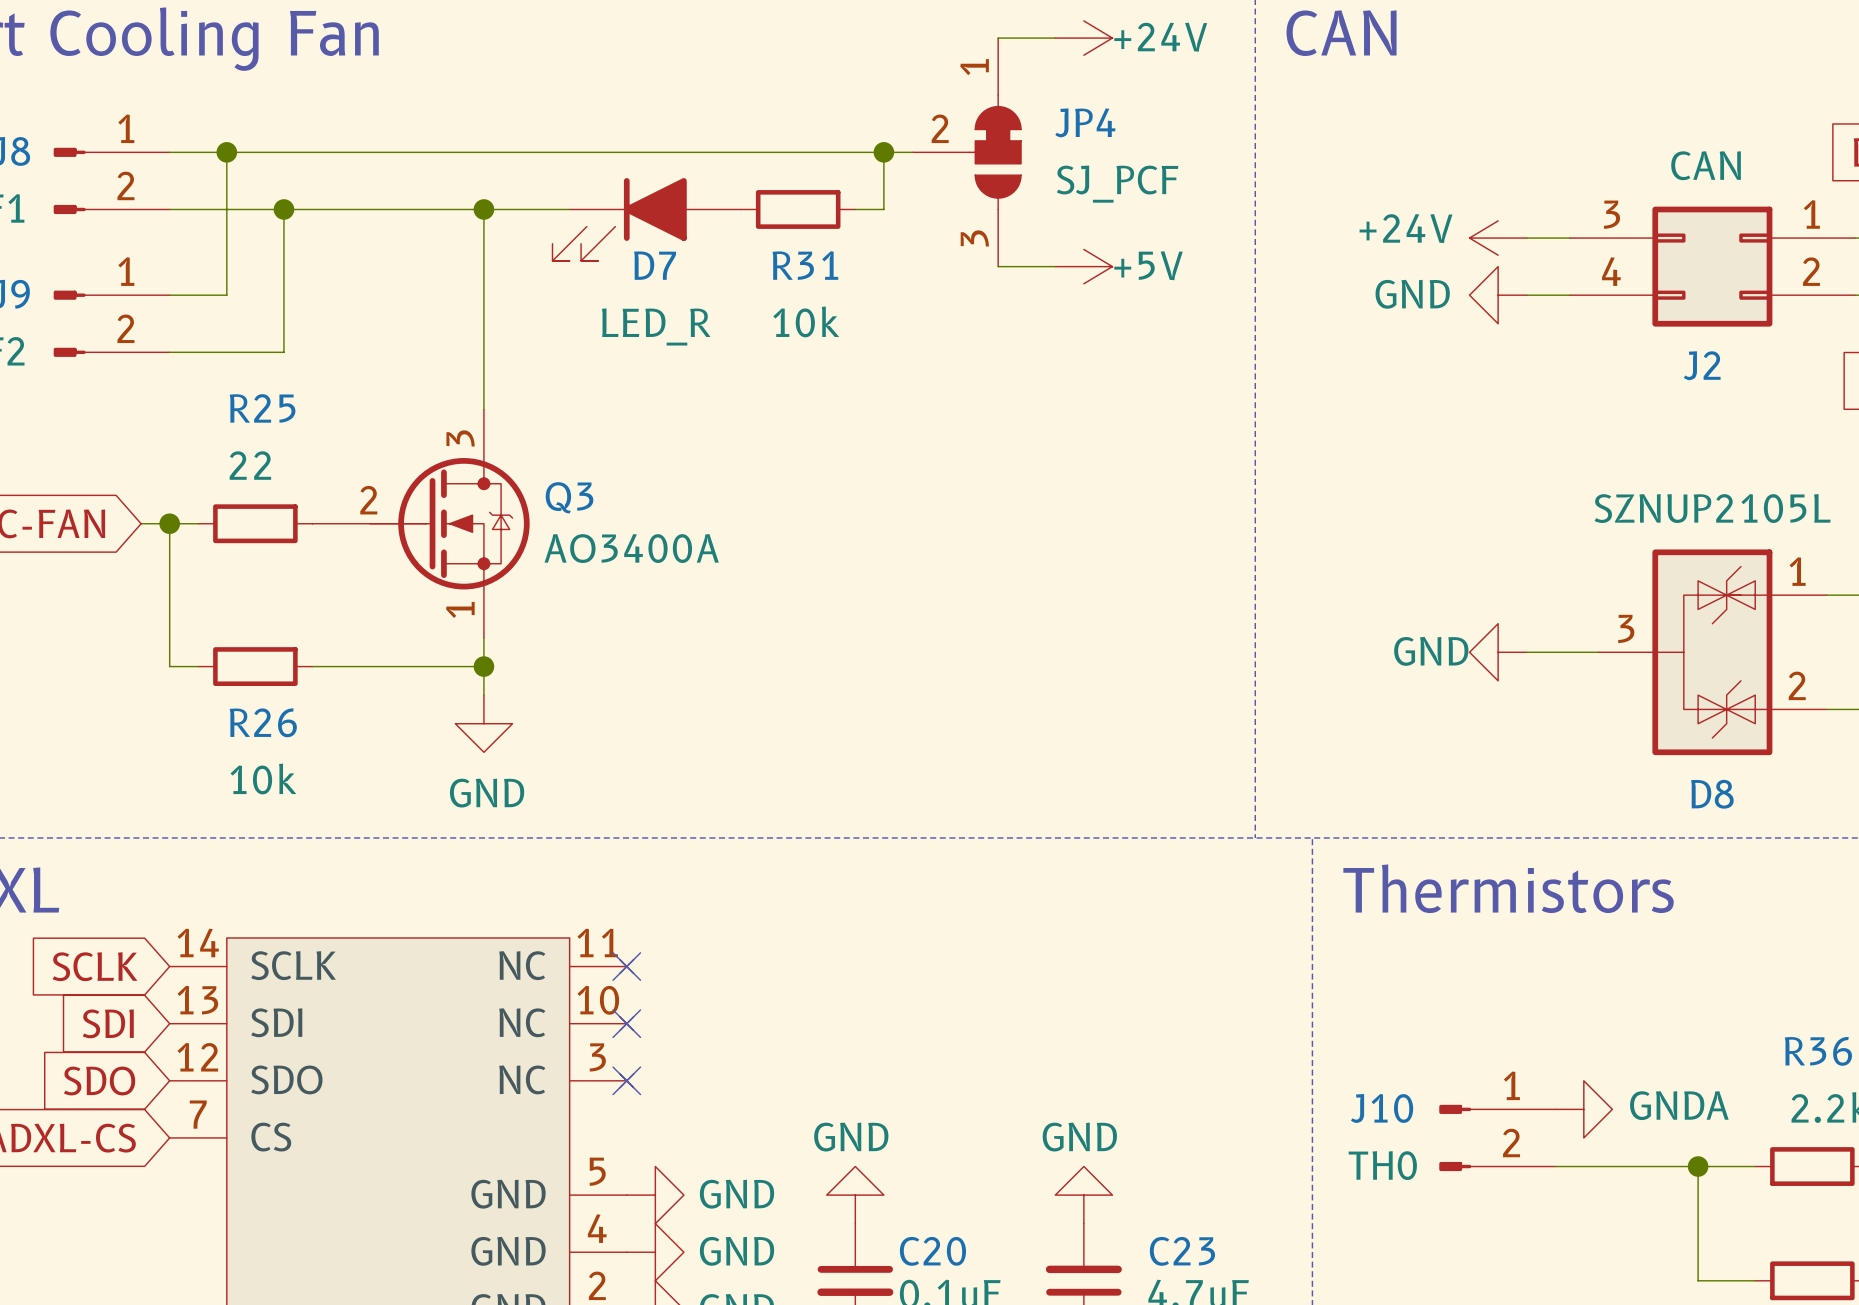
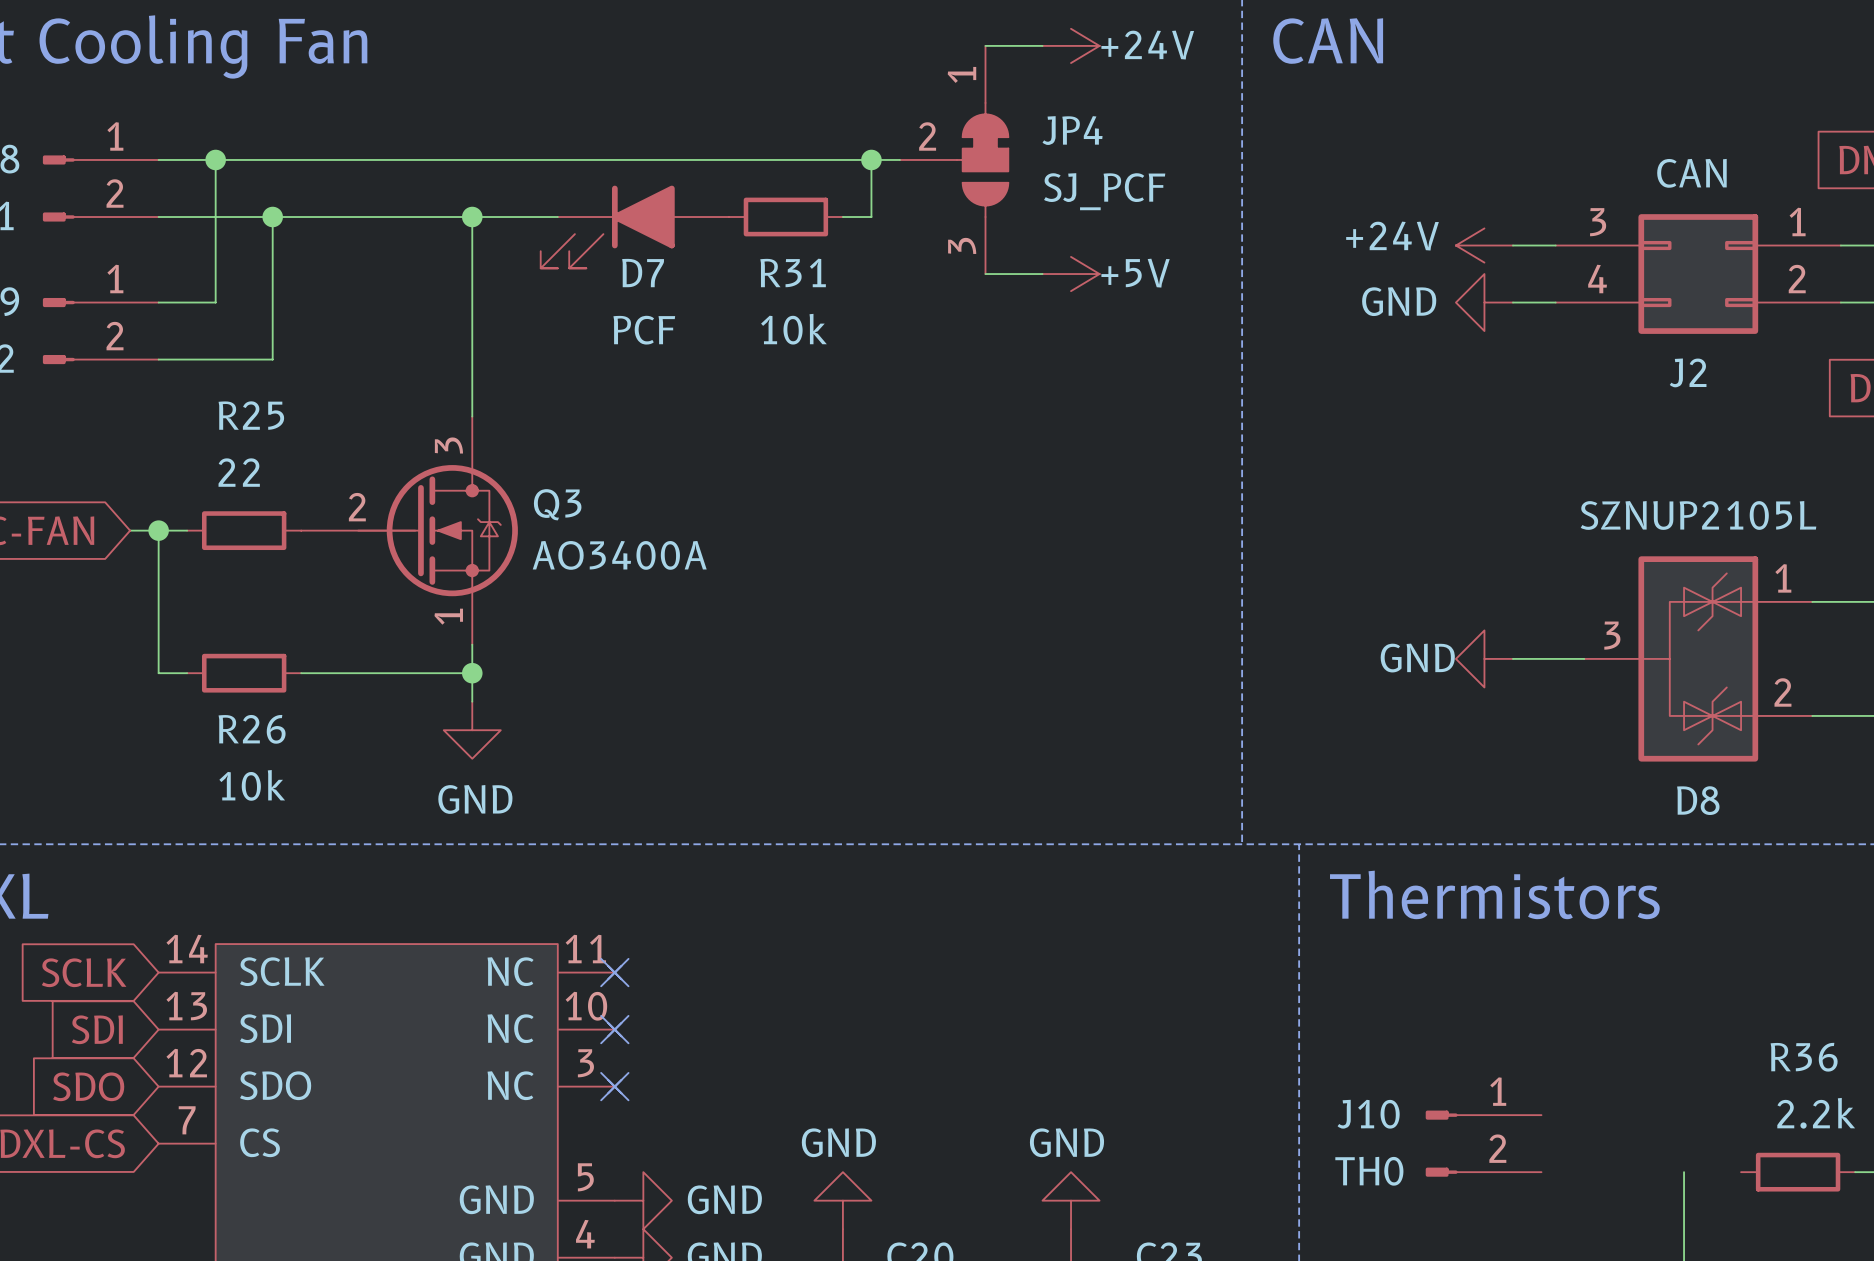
D7 value: LED_R (656, 326) -> PCF (644, 330)
power symbol: GNDA (1583, 1109) -> none
wire: (1555, 1166) (1755, 1166) -> none
junction: (1698, 1166) -> none

